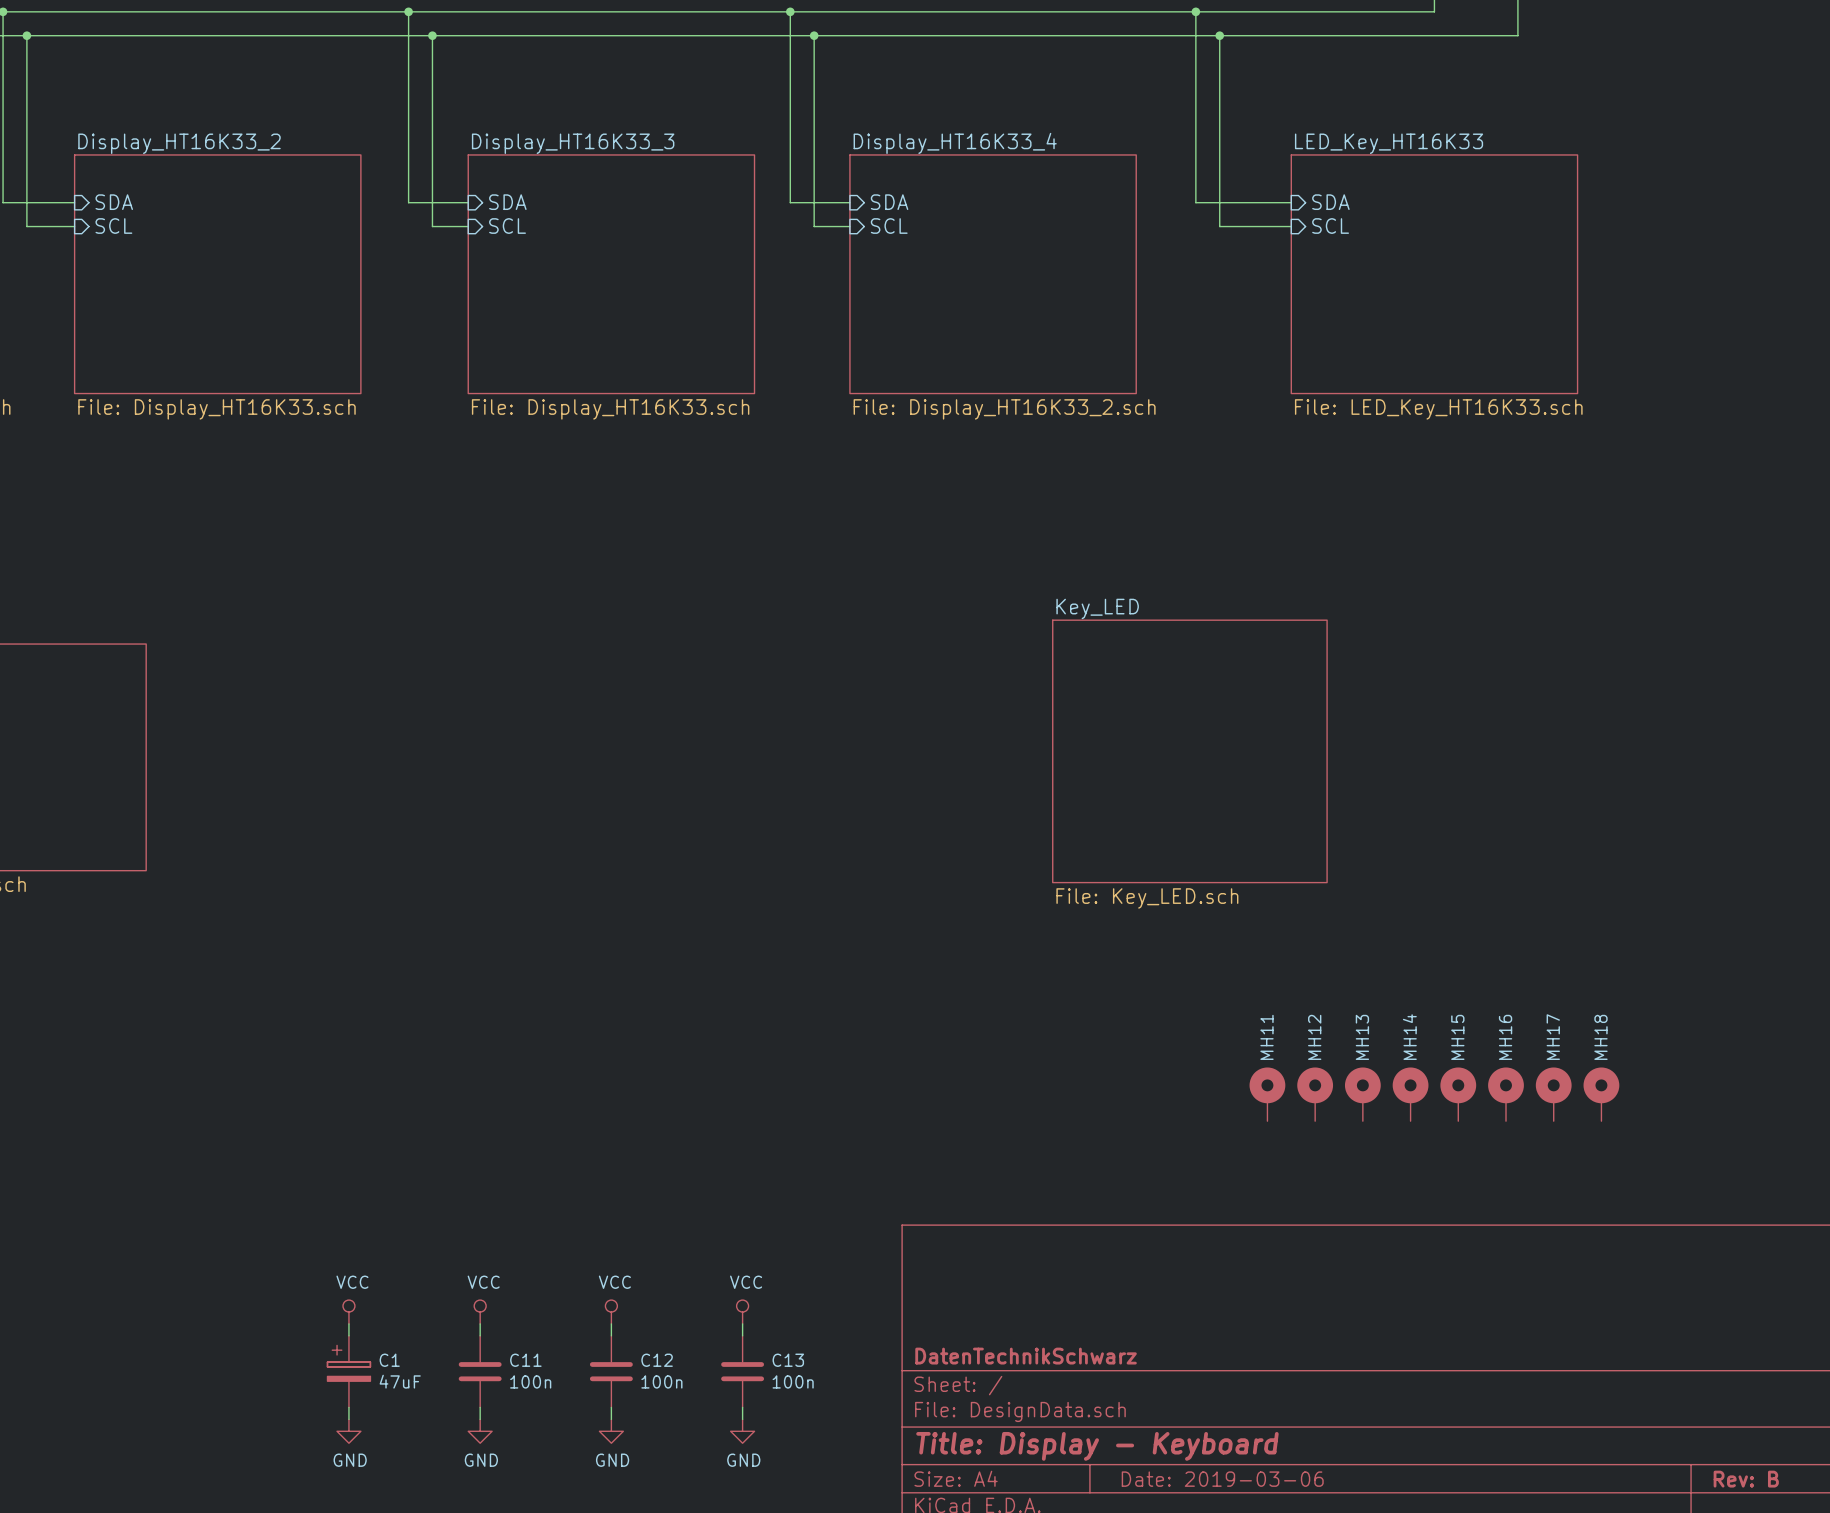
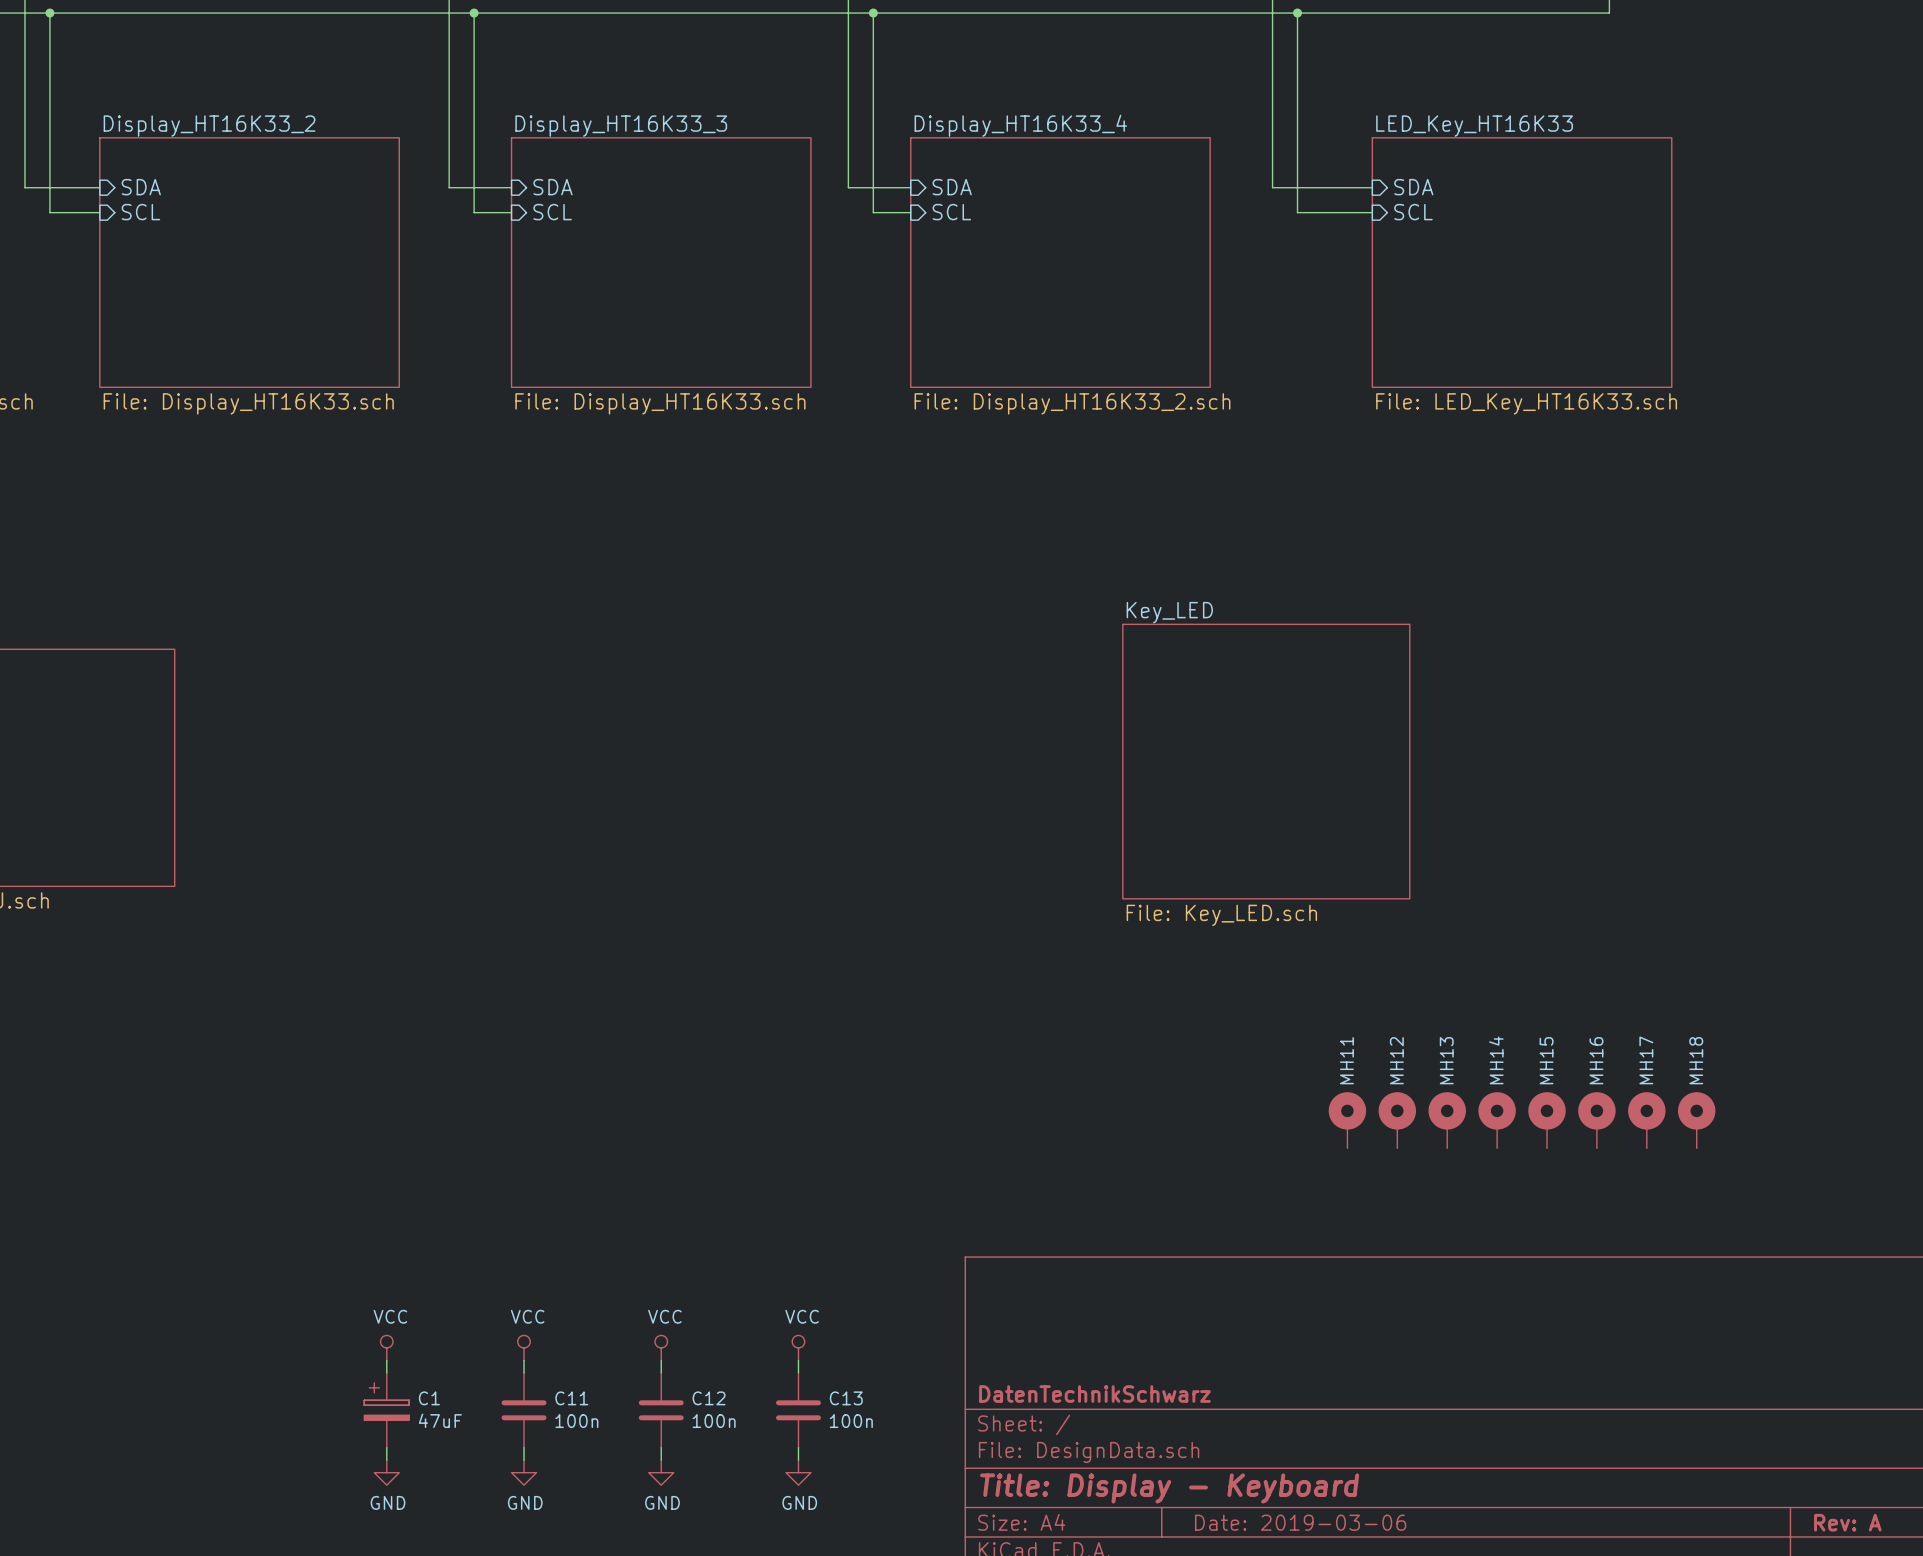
title block: Rev: B (1746, 1479) -> Rev: A (1847, 1522)

